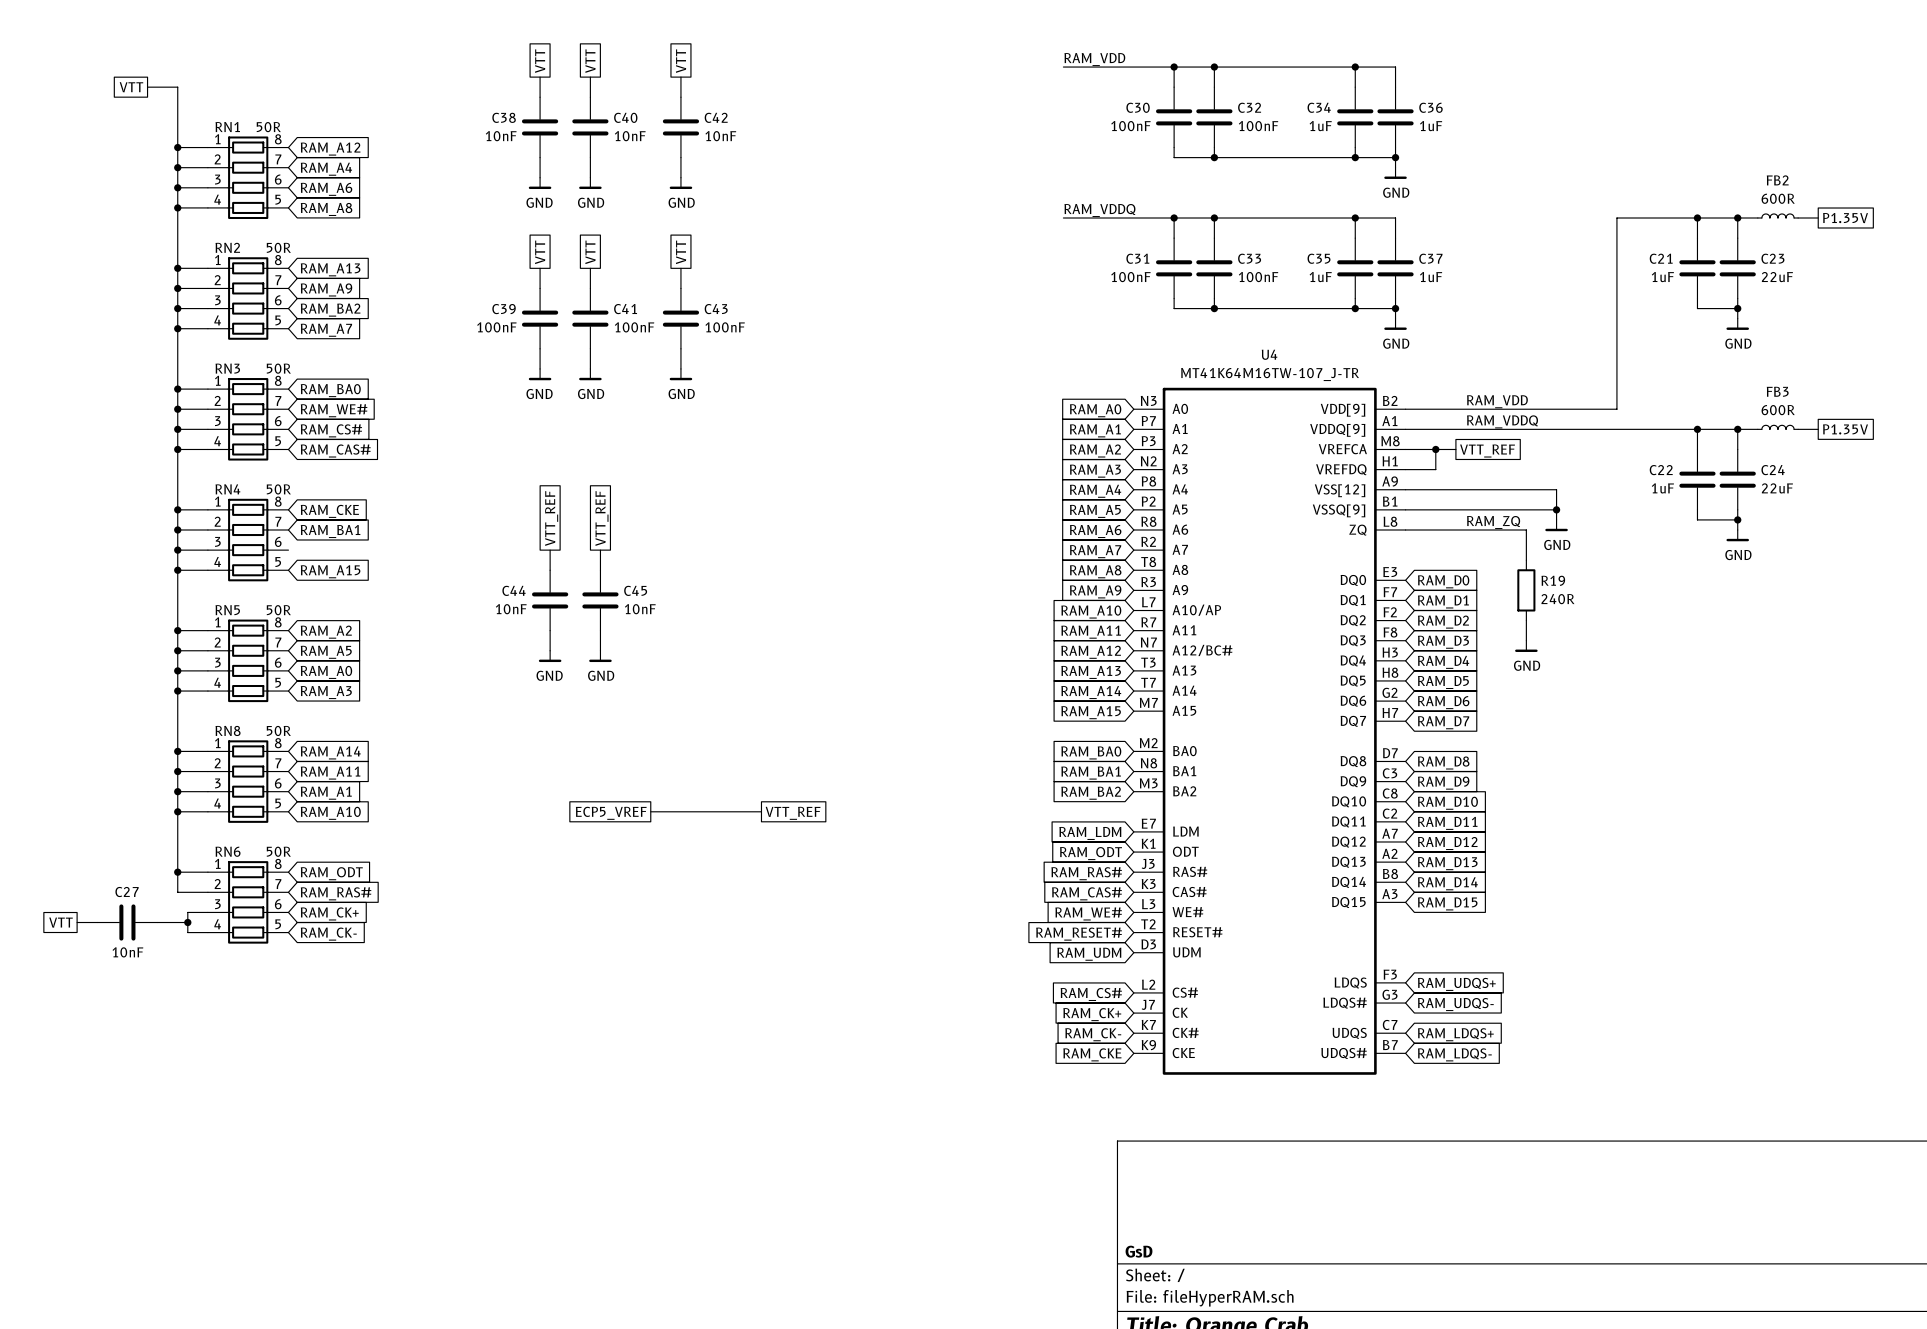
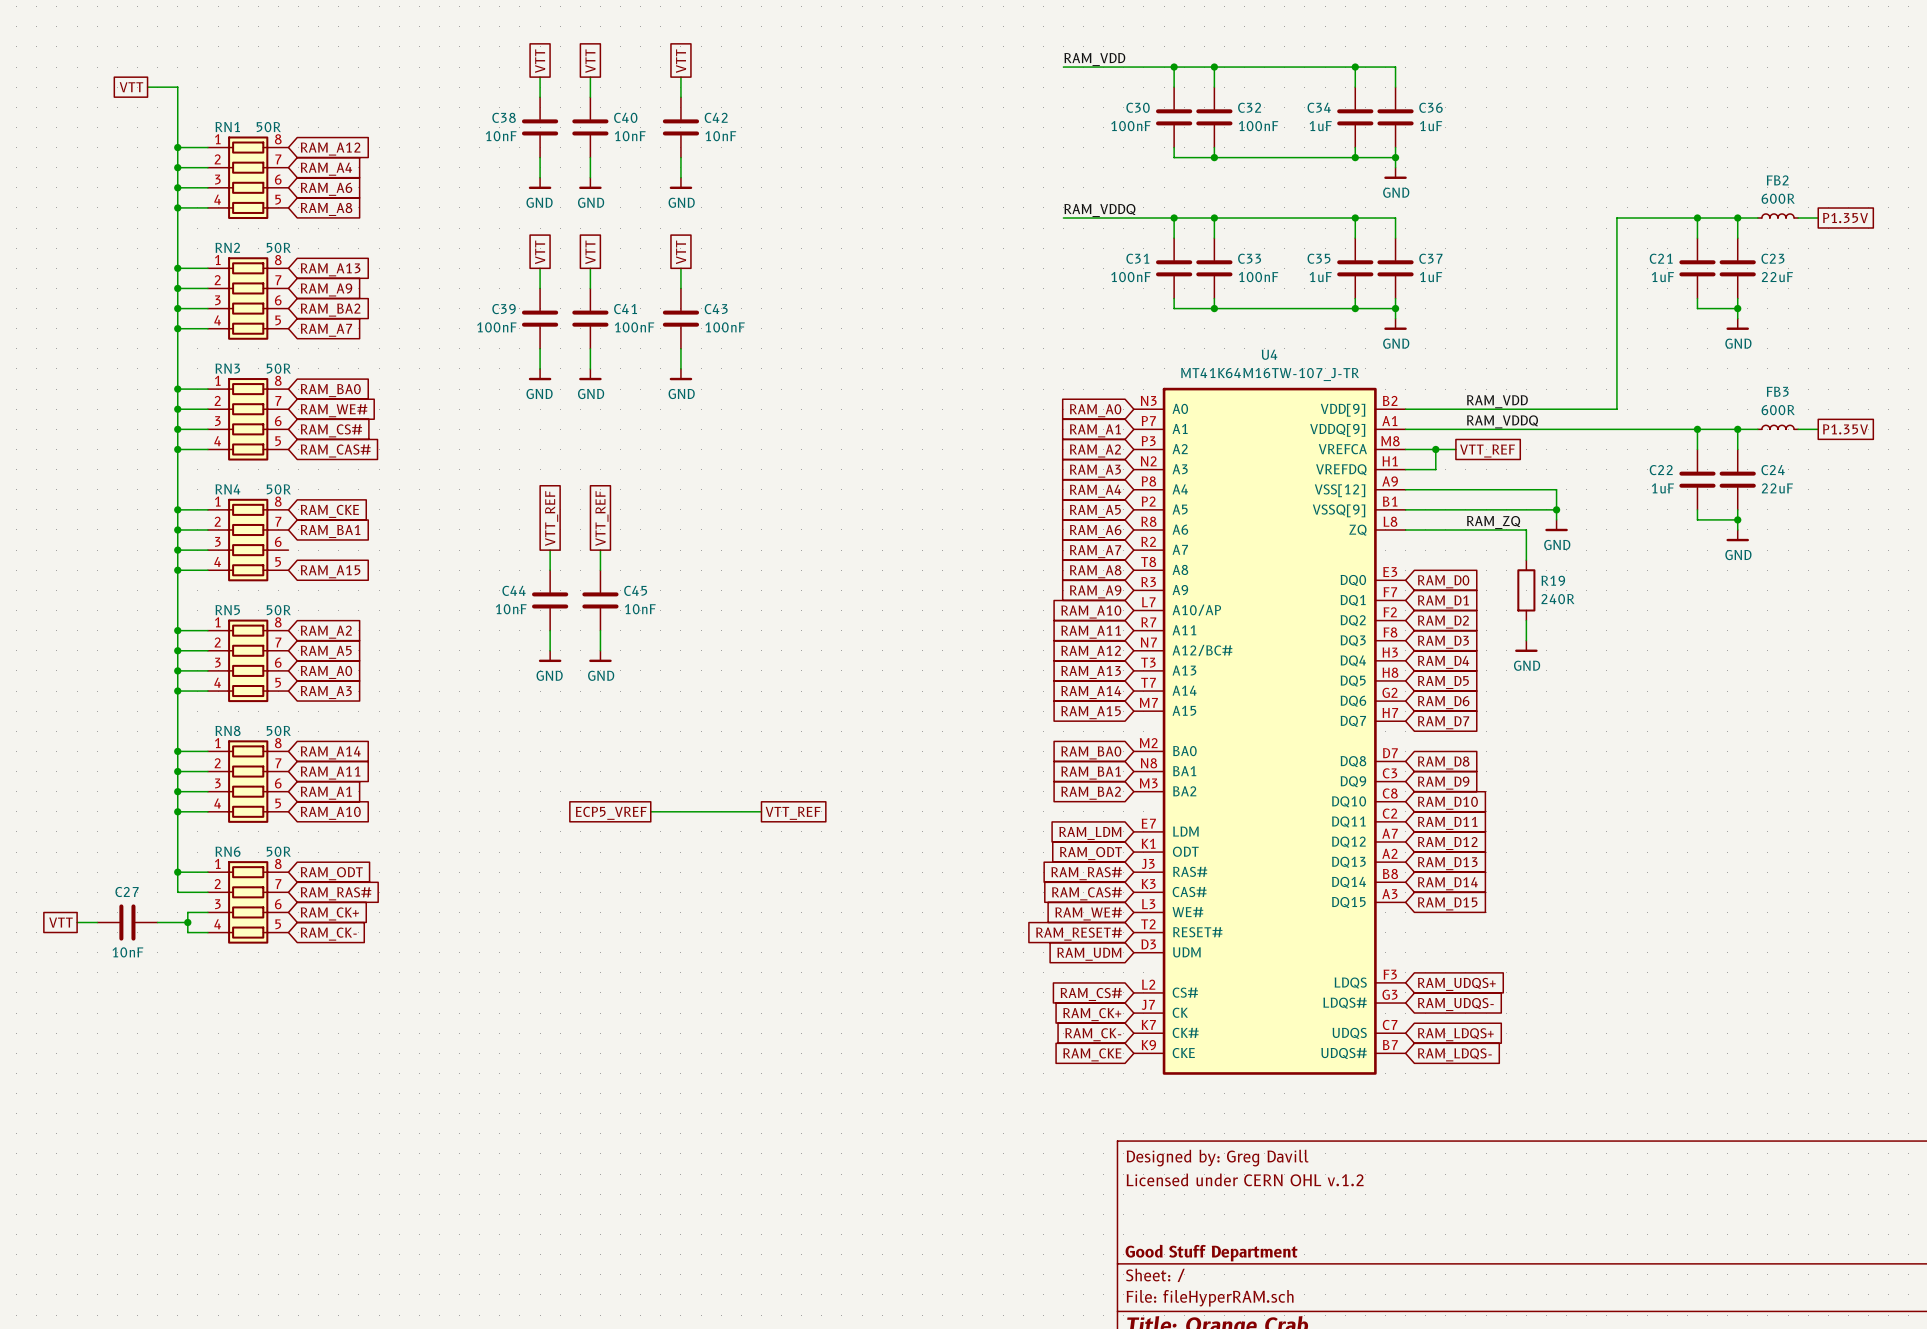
title block: none -> Designed by: Greg Davill (1217, 1158)
title block: none -> Licensed under CERN OHL v.1.2 (1245, 1179)
title block: GsD (1139, 1251) -> Good Stuff Department (1211, 1253)

